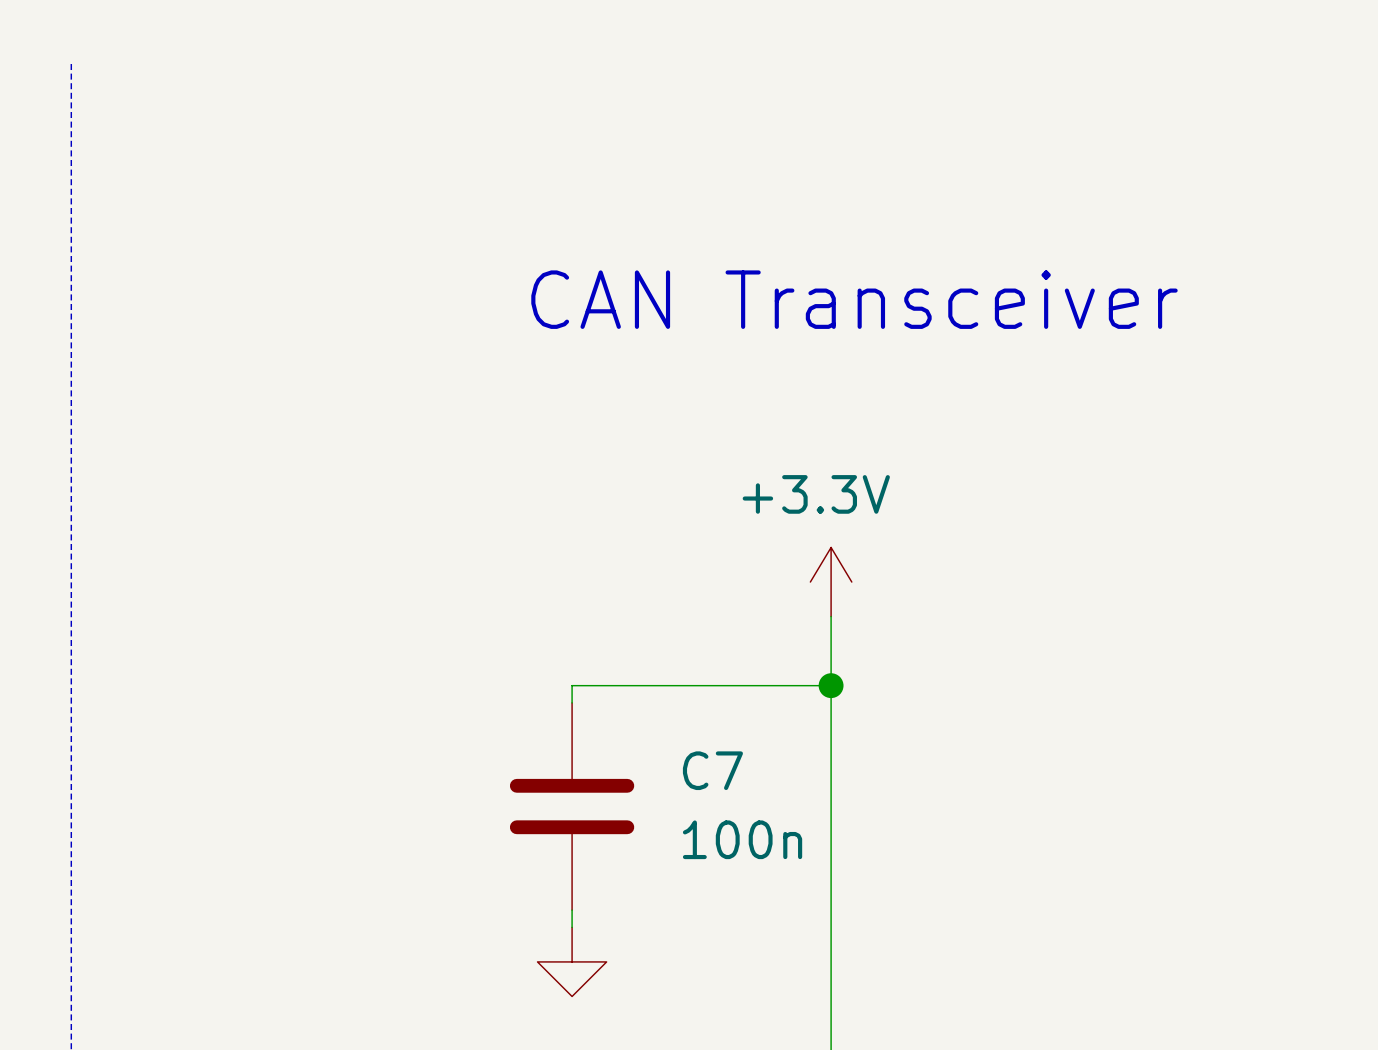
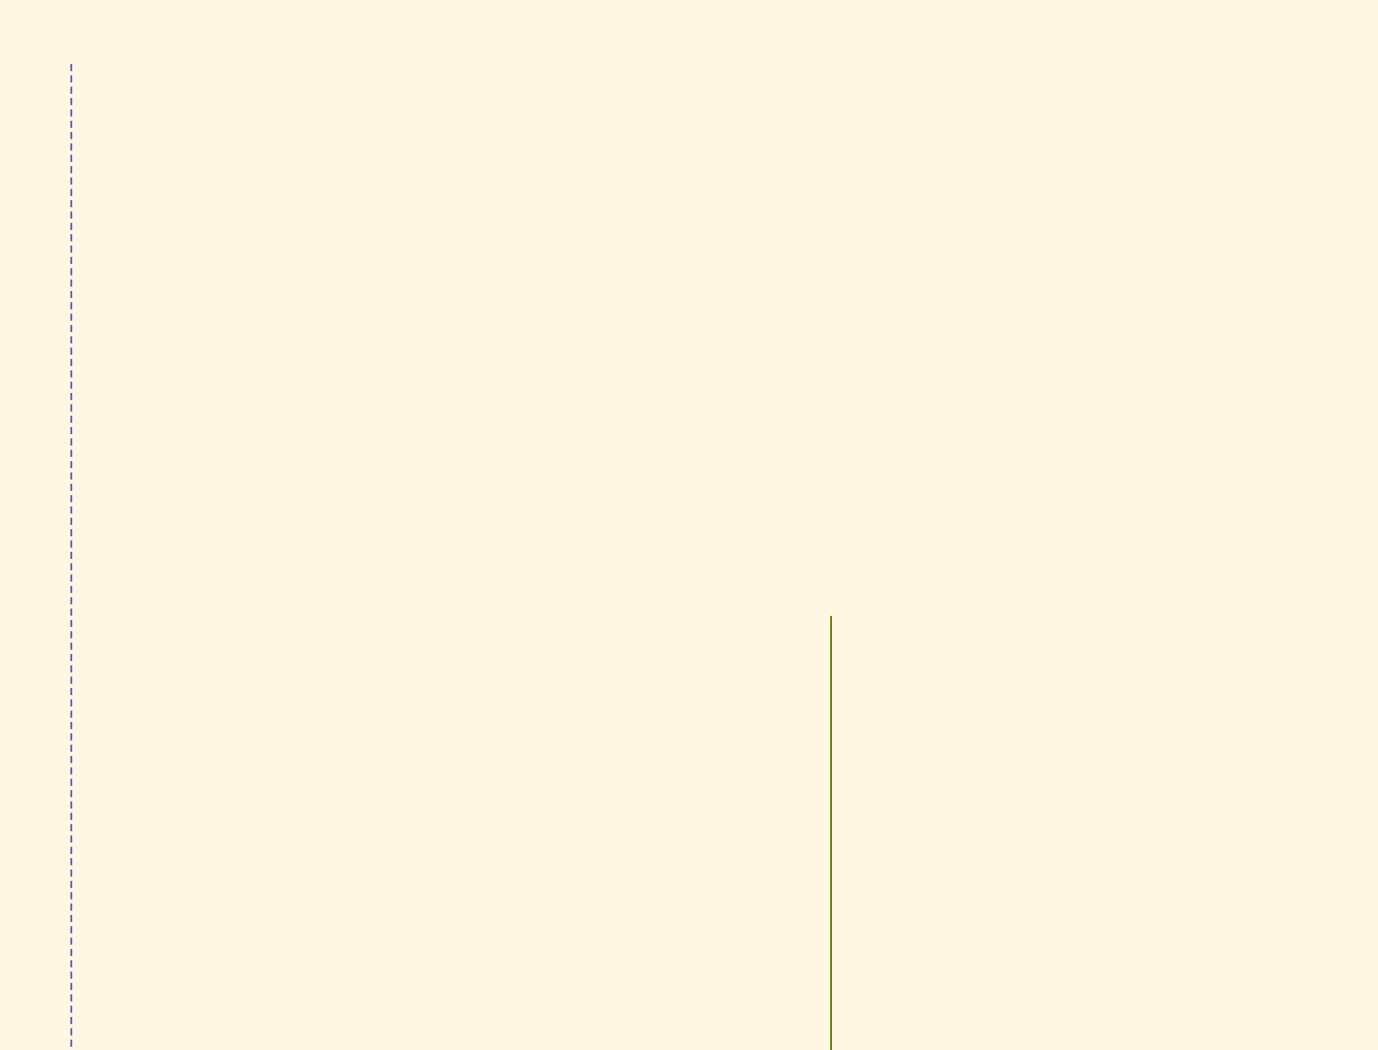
text: CAN Transceiver (854, 299) -> none
power symbol: +3.3V (831, 582) -> none
wire: (831, 685) (572, 685) (572, 702) -> none
junction: (831, 685) -> none
C7: 100n (572, 806) -> none
wire: (572, 910) (572, 927) -> none
power symbol: (572, 961) -> none

